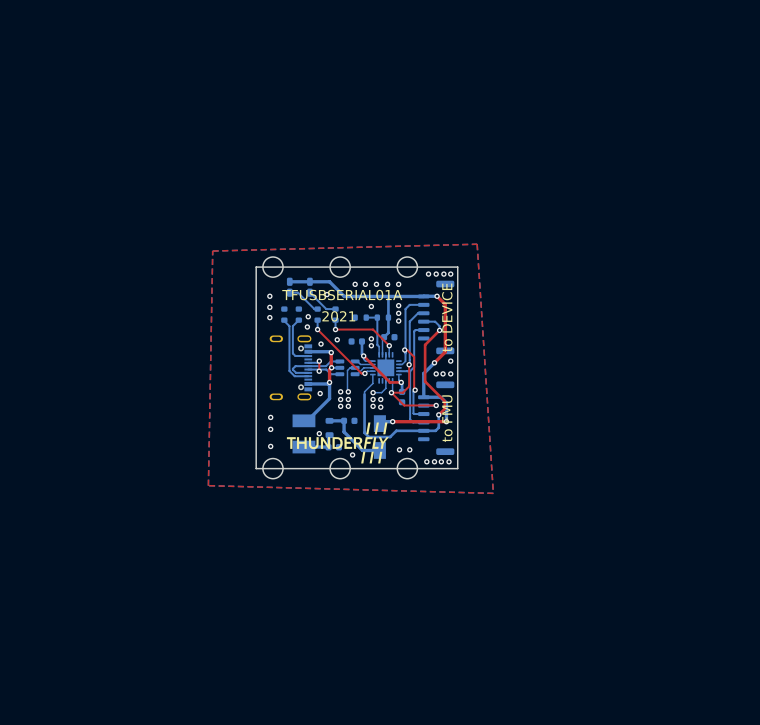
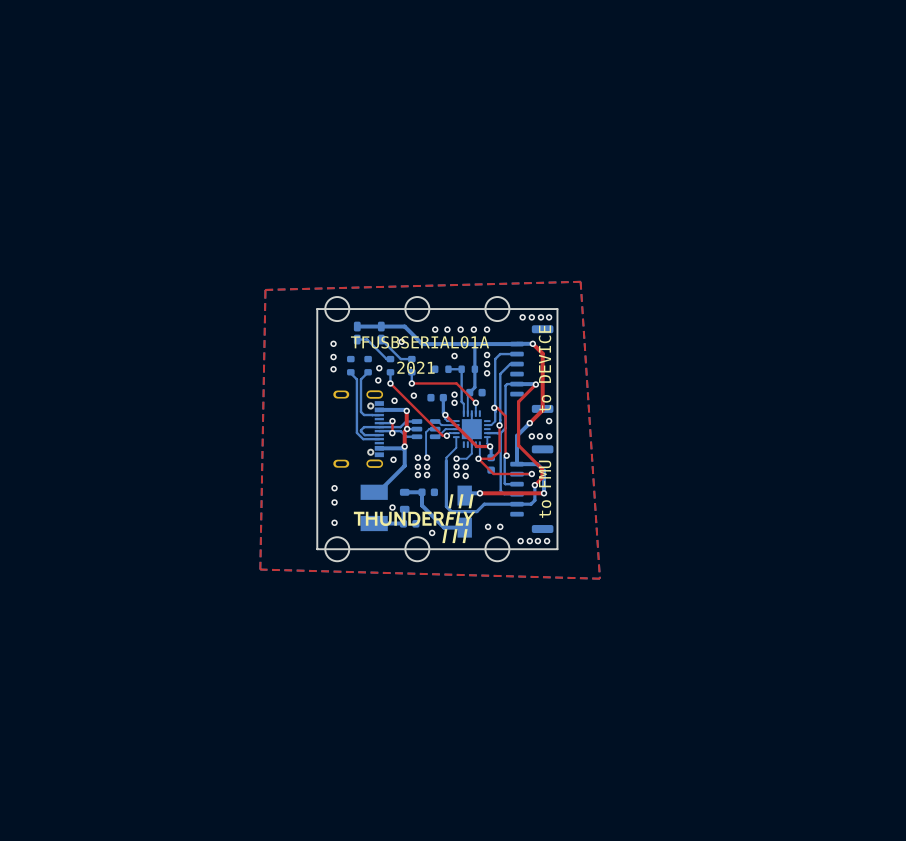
bottom track: (423, 321) (435, 321) (439, 326) (439, 330) -> none
bottom track: none -> (517, 384) (535, 384)

